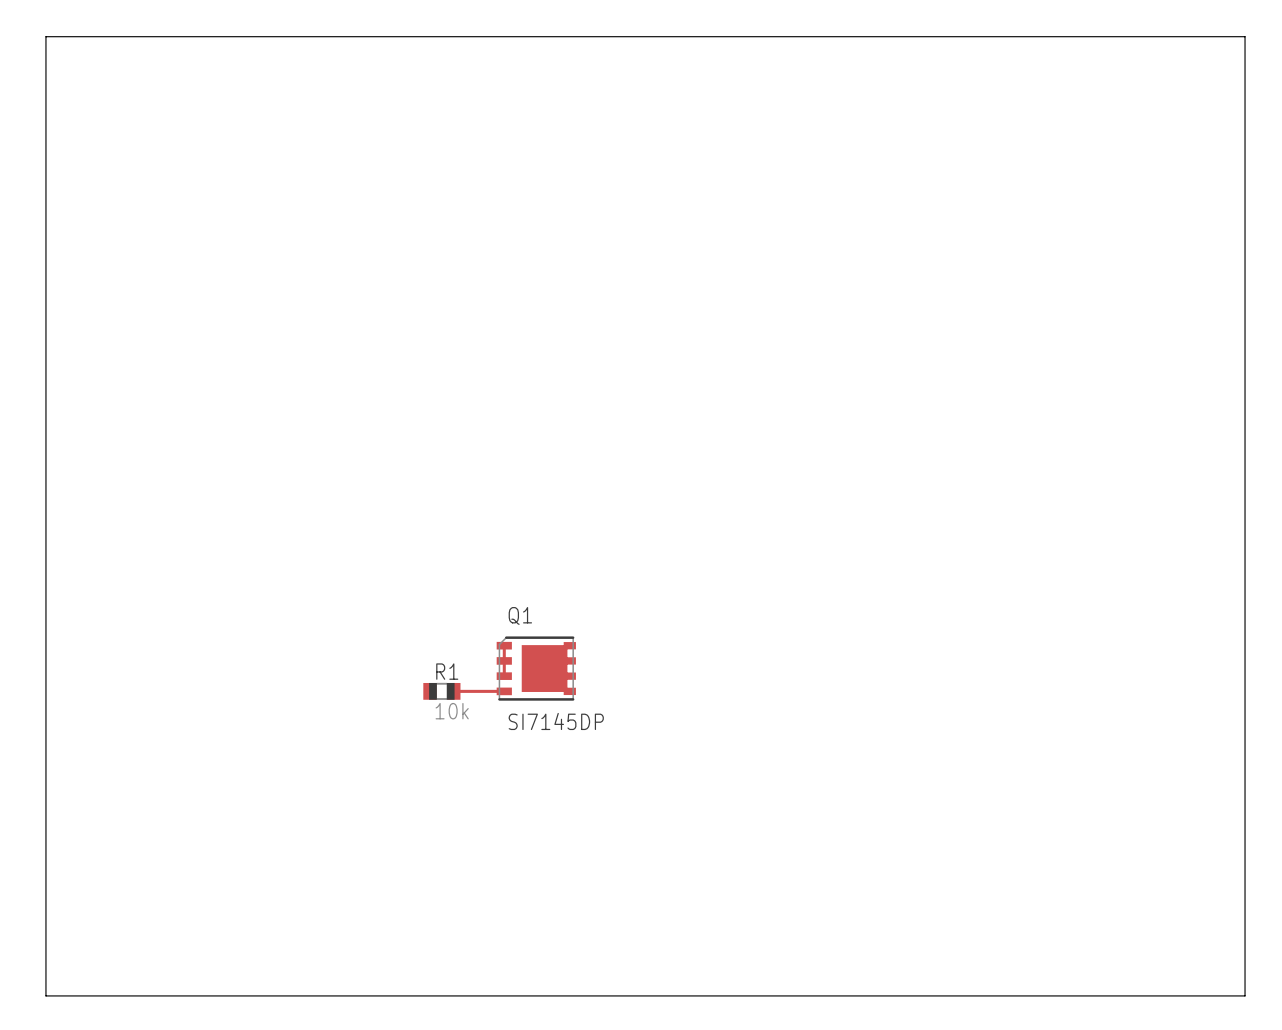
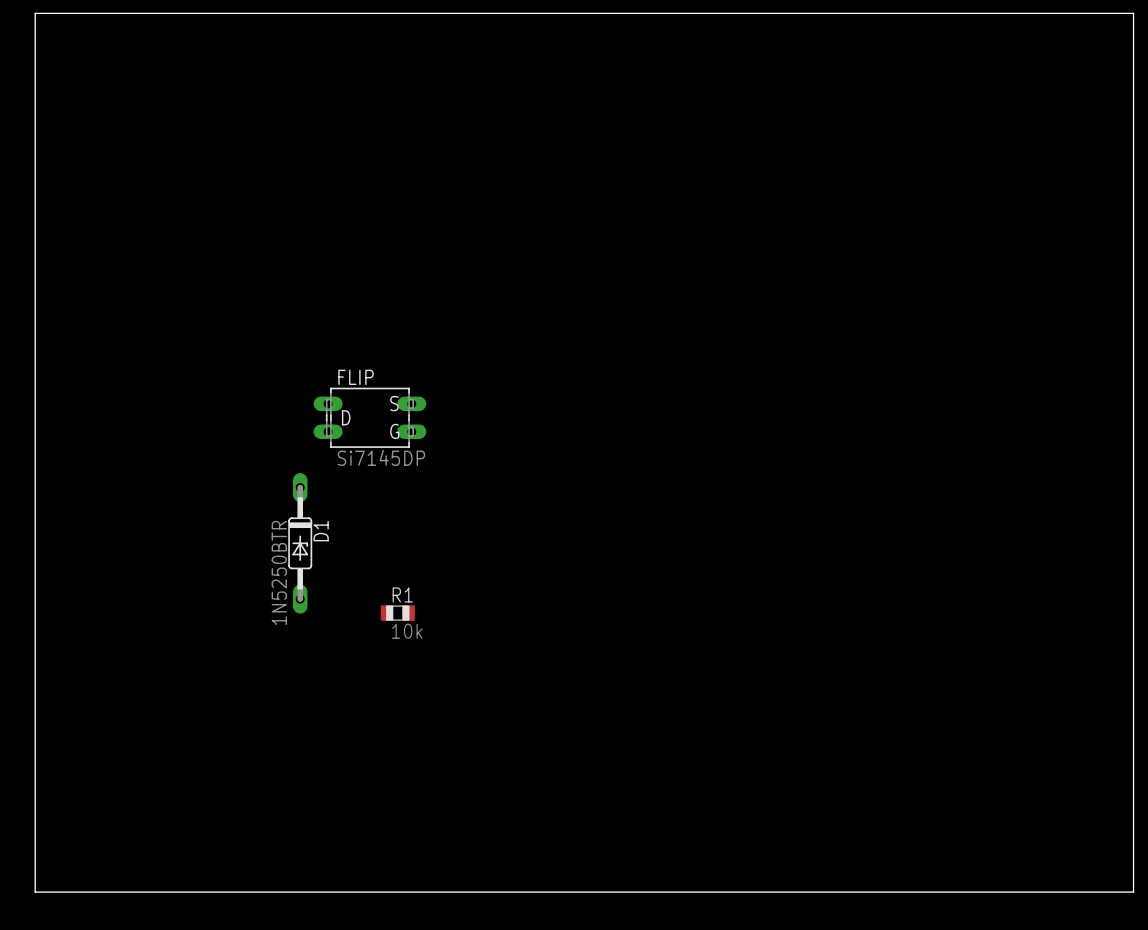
FLIP: none -> Si7145DP (369, 417)
D1: none -> 1N5250BTR (300, 543)
track: (504, 645) (504, 676) -> none
Q1: SI7145DP (536, 668) -> none
track: (453, 691) (504, 691) -> none

